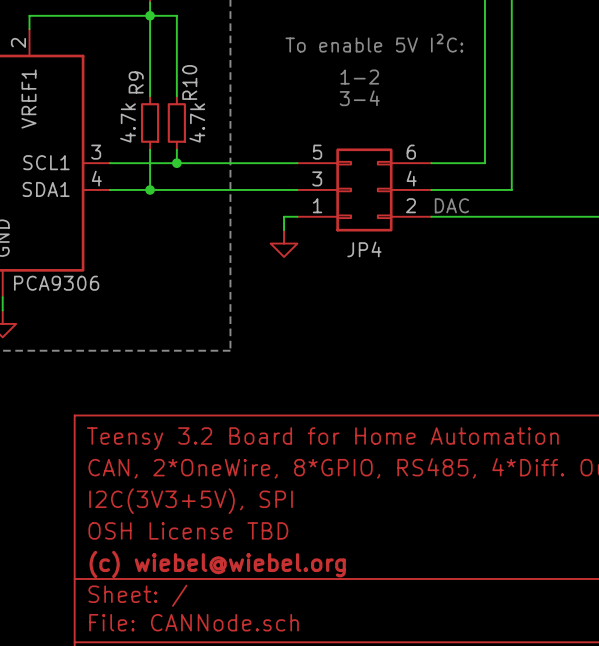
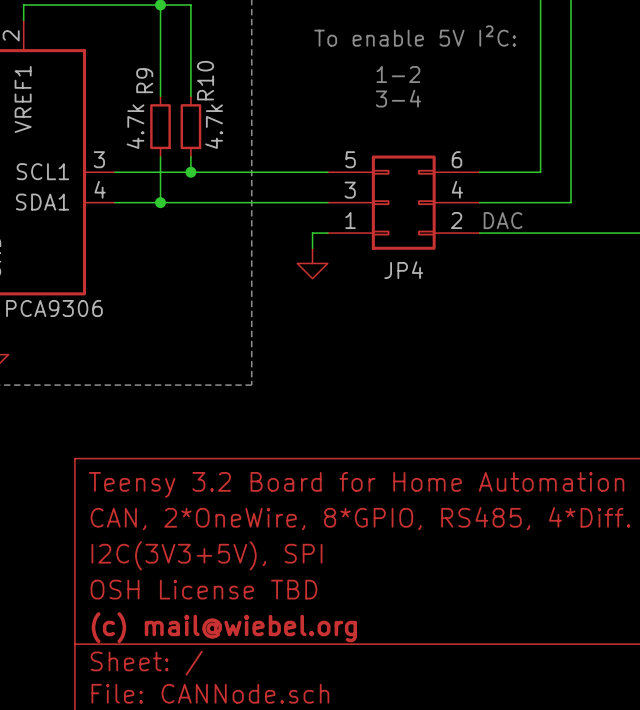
title block: (c) wiebel@wiebel.org (217, 564) -> (c) mail@wiebel.org (224, 627)

